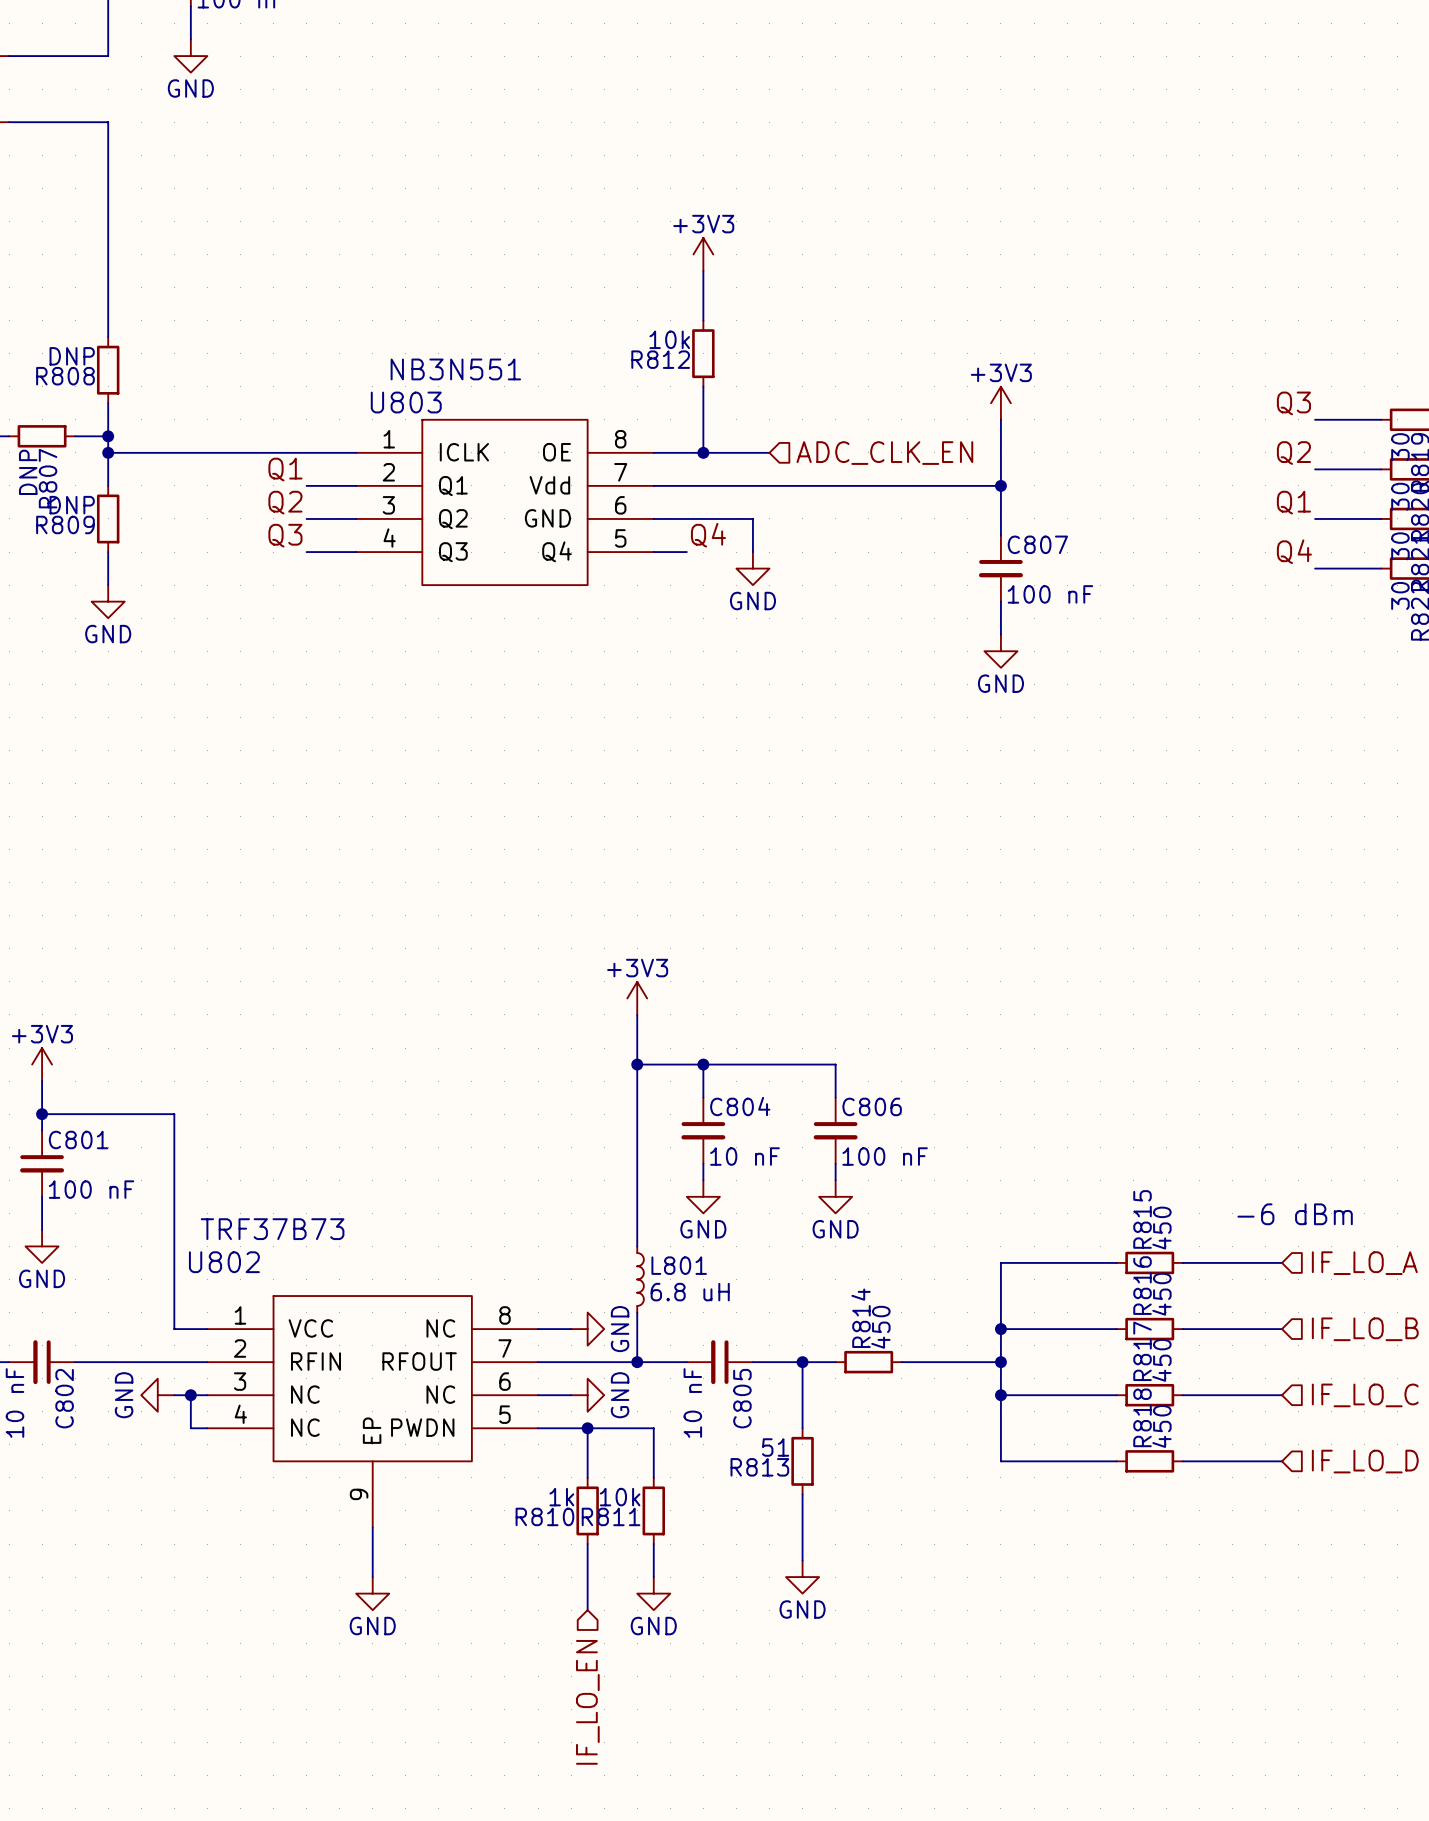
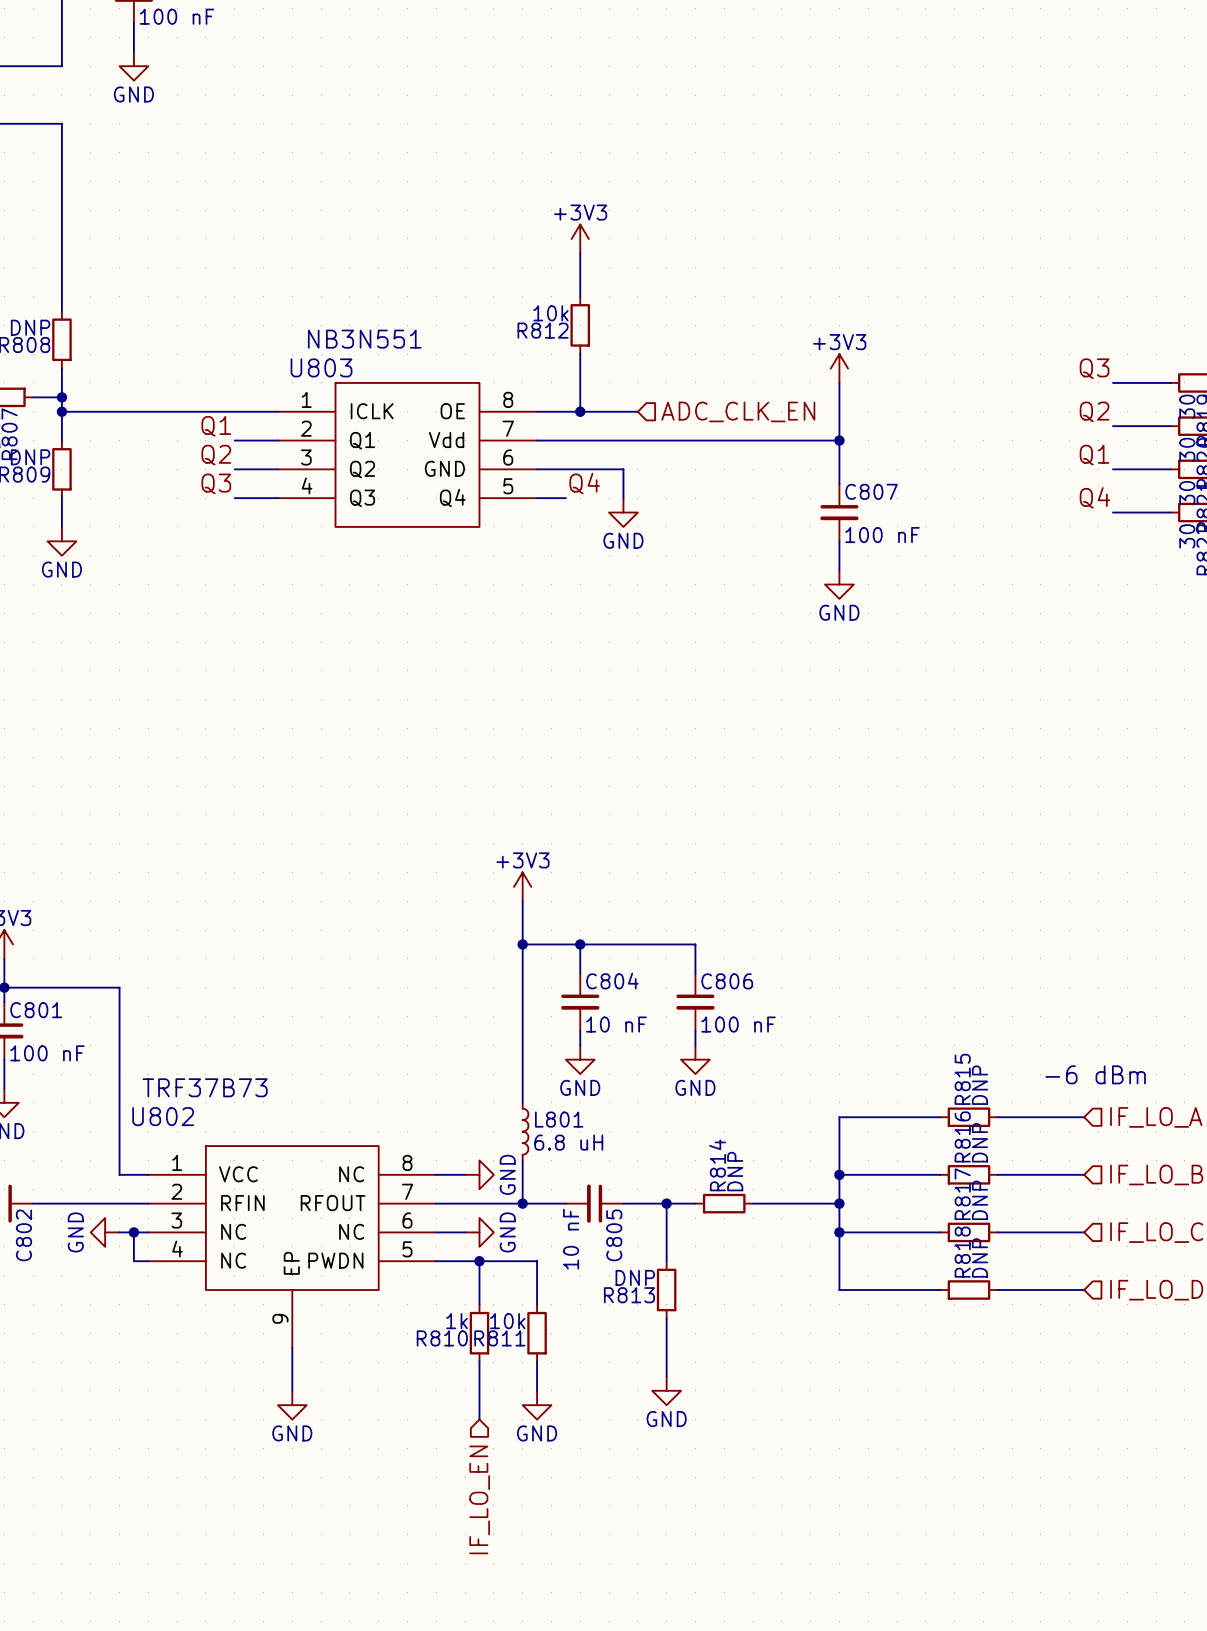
R815 value: 450 (1161, 1228) -> DNP (979, 1085)
R816 value: 450 (1161, 1294) -> DNP (979, 1142)
R814 value: 450 (880, 1327) -> DNP (735, 1171)
R817 value: 450 (1161, 1360) -> DNP (979, 1200)
R818 value: 450 (1161, 1426) -> DNP (979, 1257)
R813 value: 51 (775, 1447) -> DNP (635, 1277)

